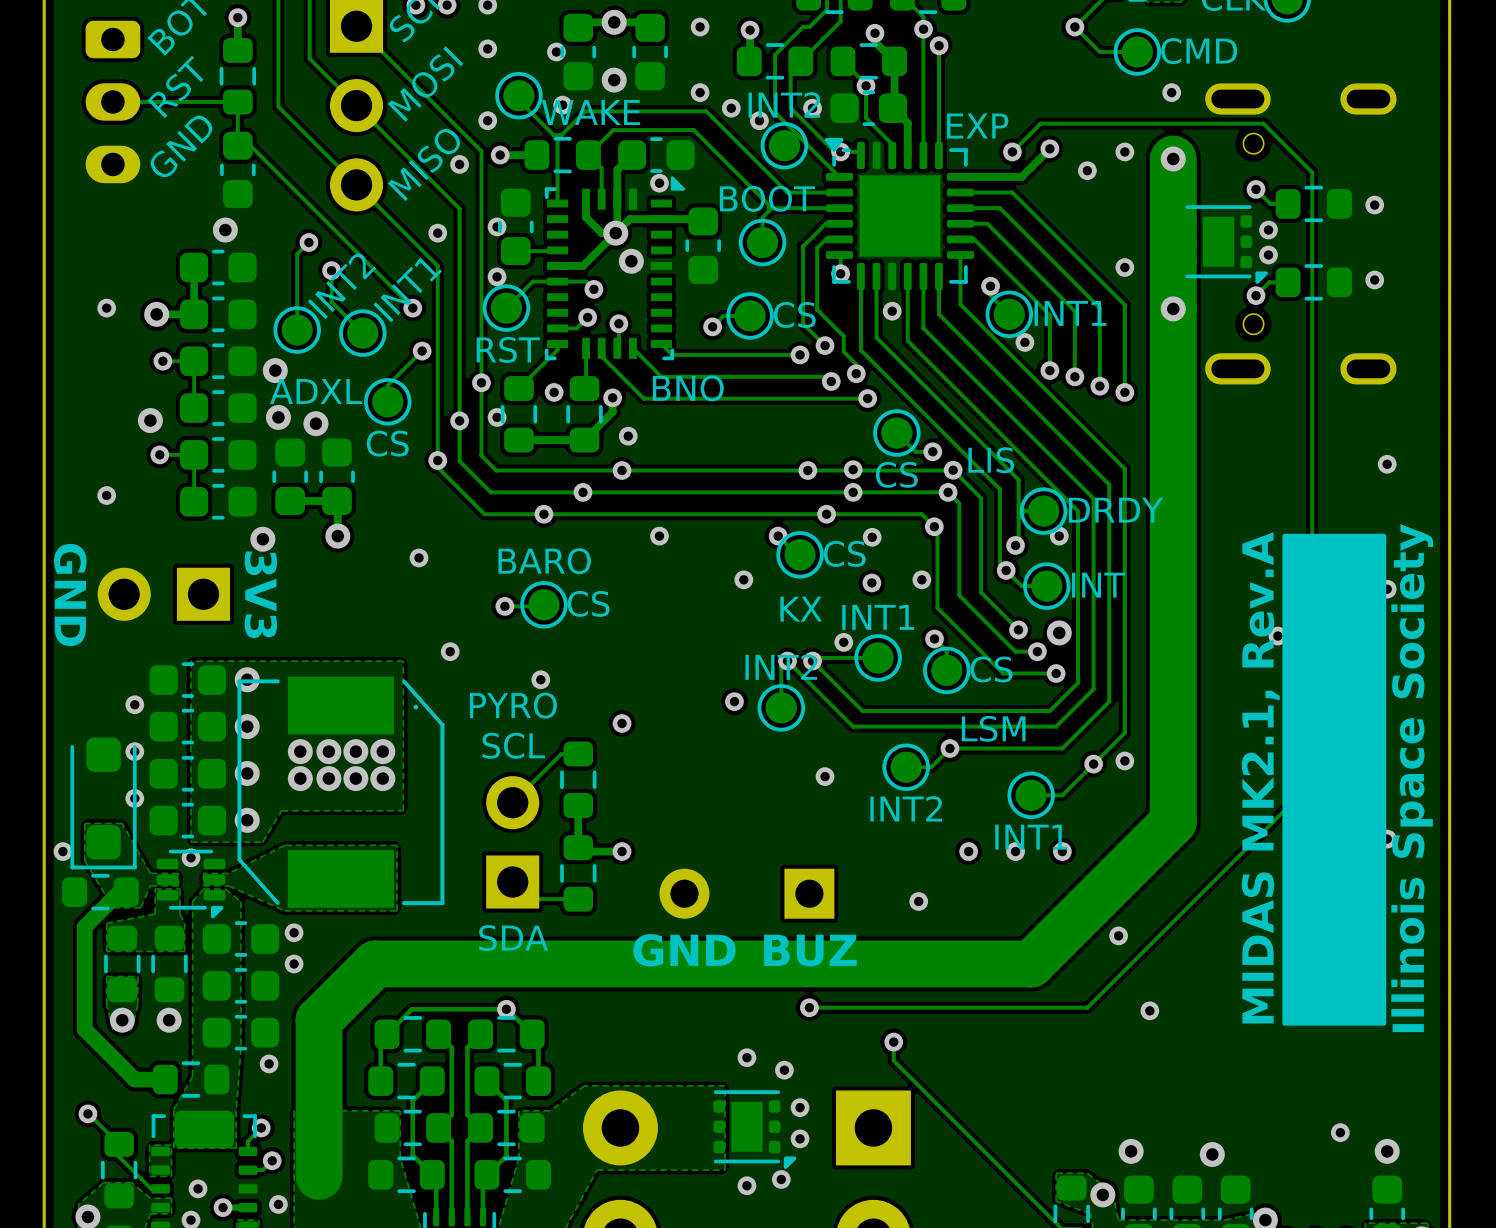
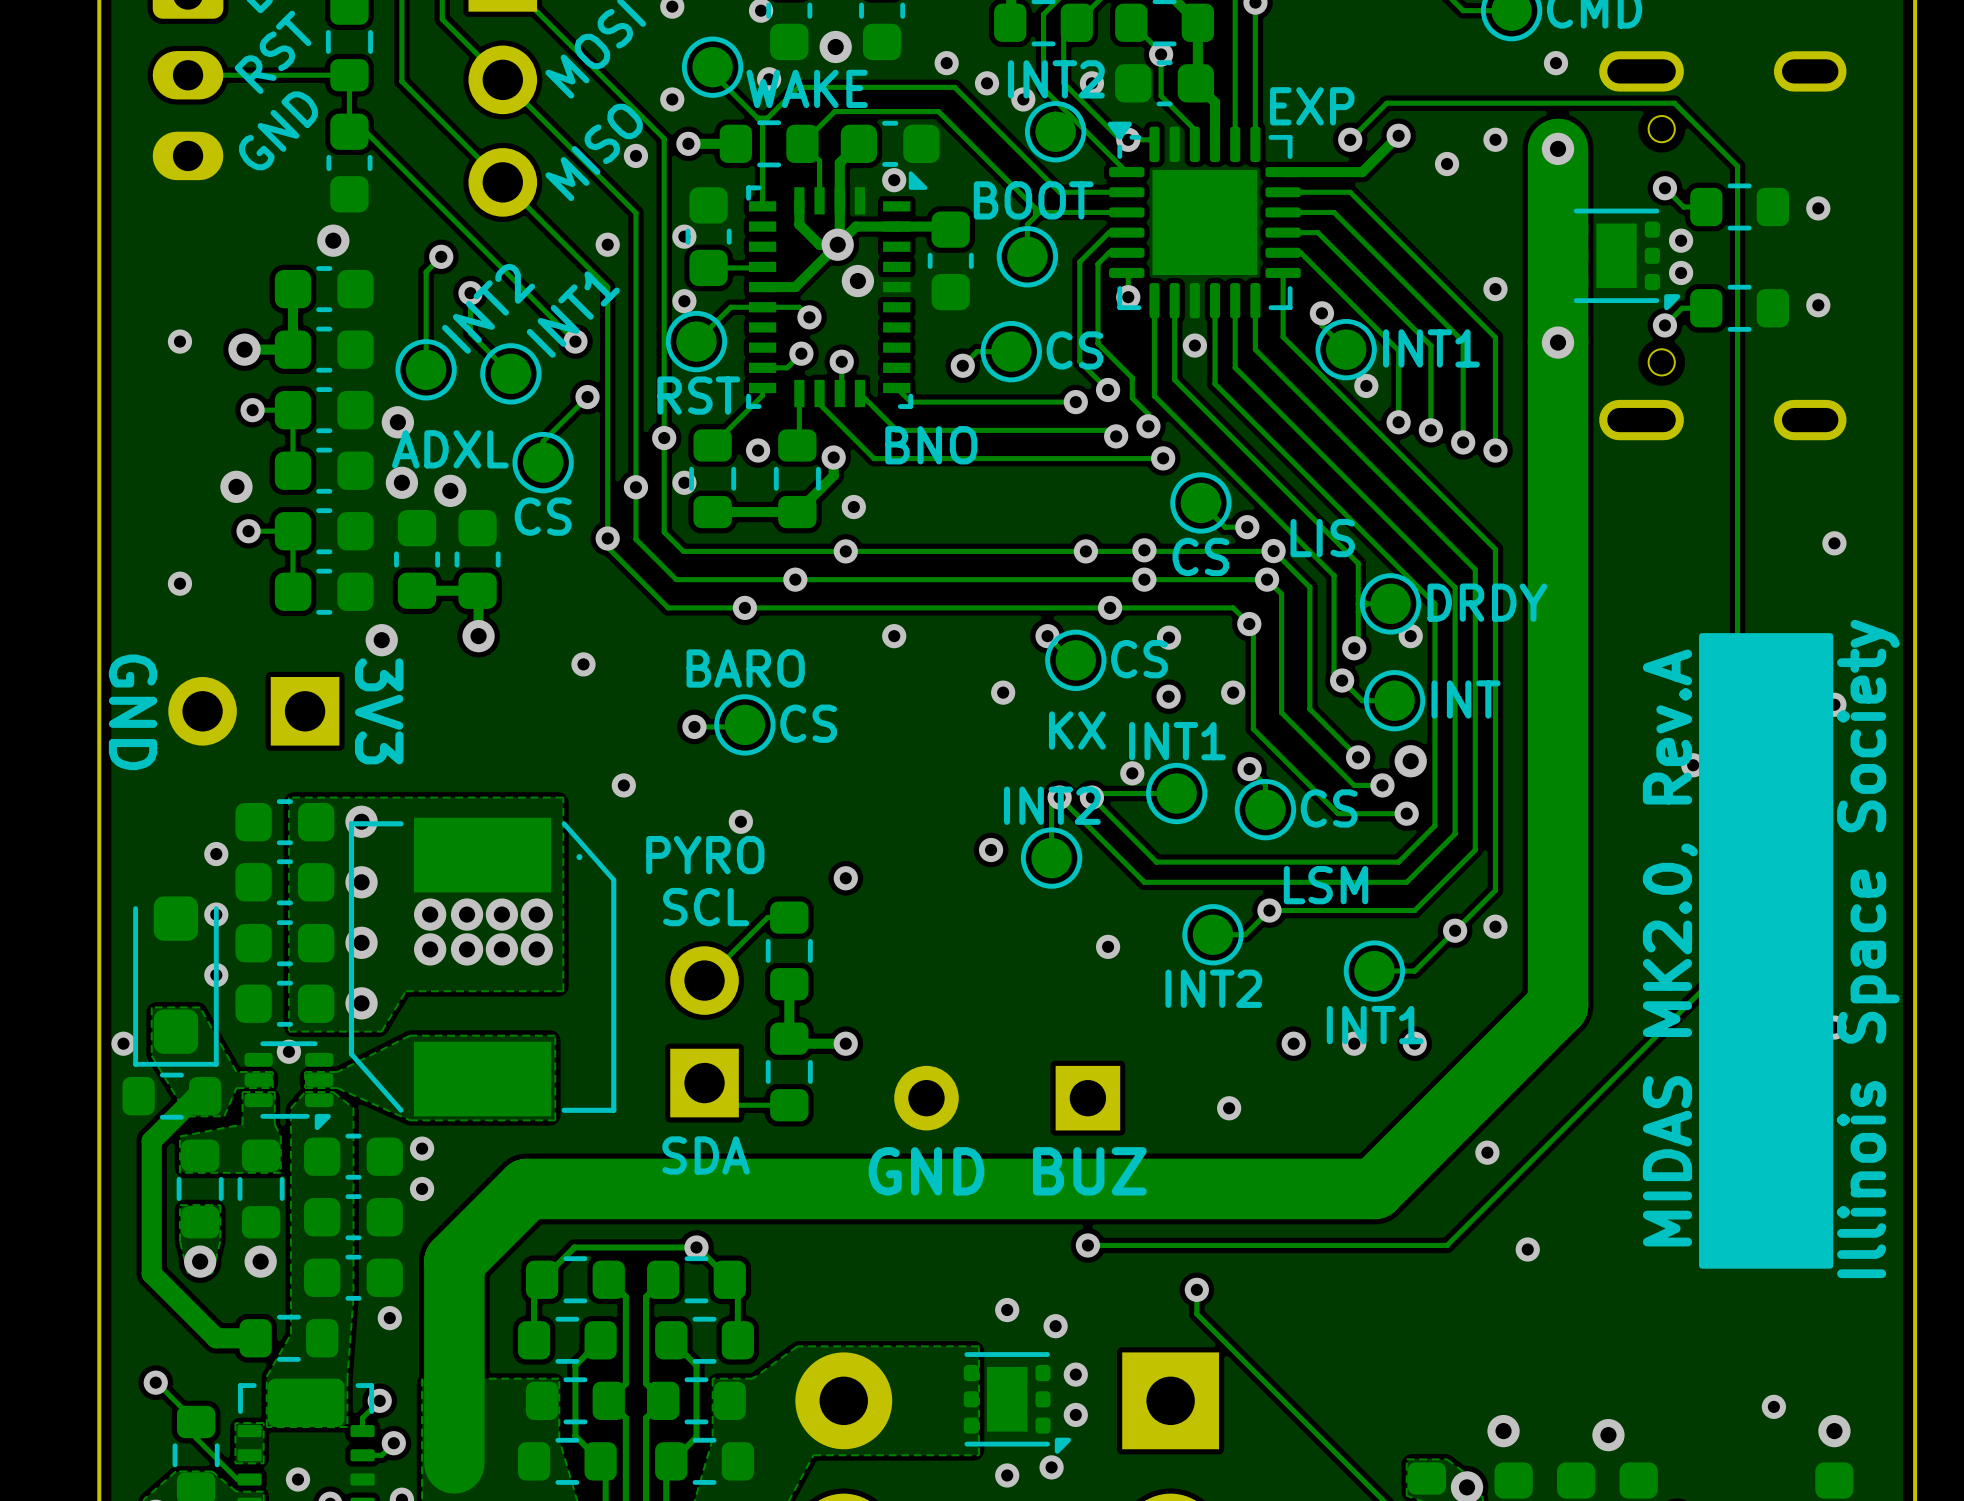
text: MIDAS MK2.1, Rev.A (1260, 777) -> MIDAS MK2.0, Rev.A (1670, 948)

